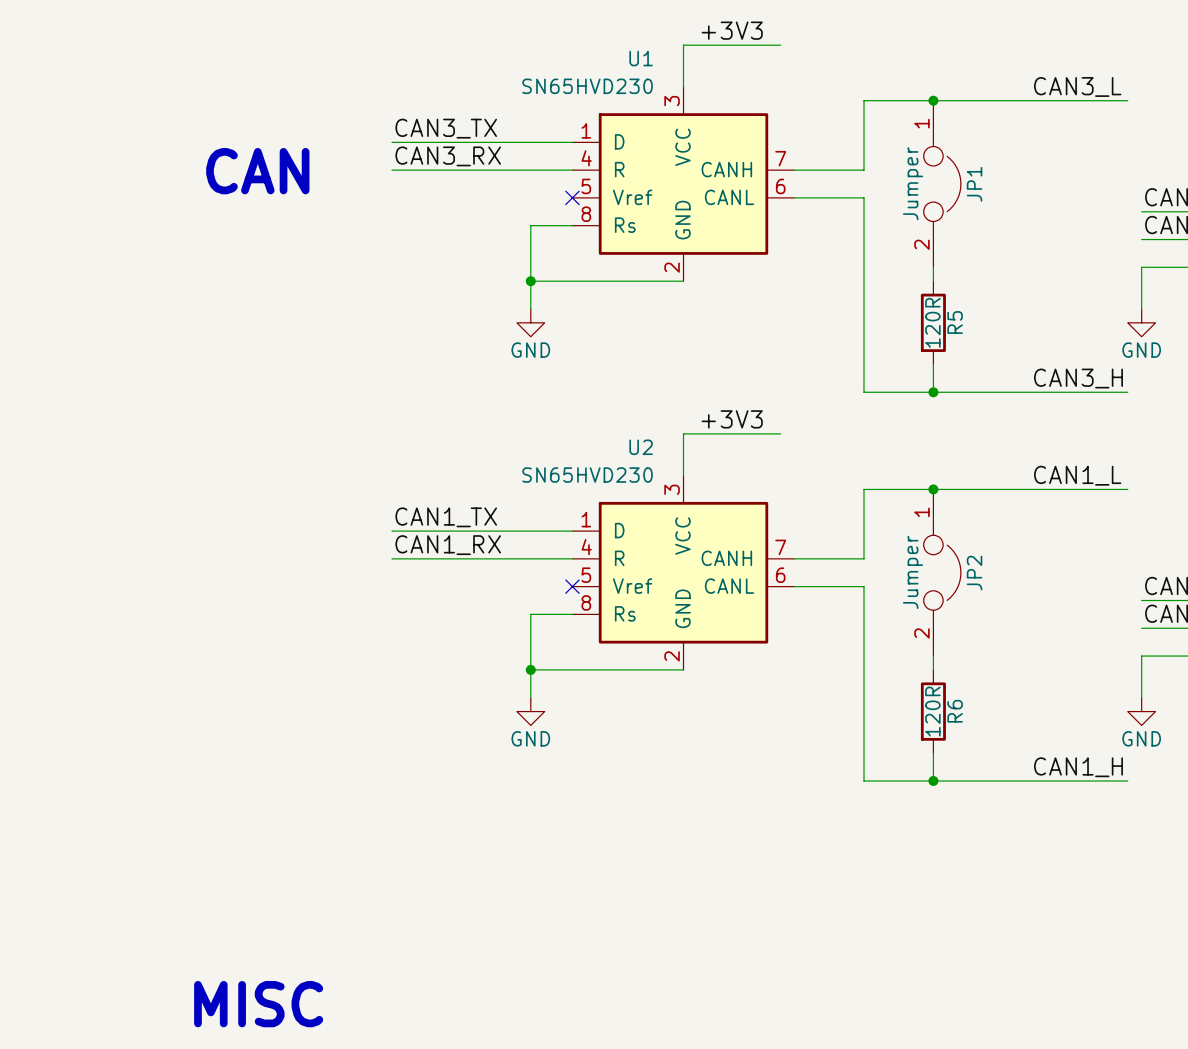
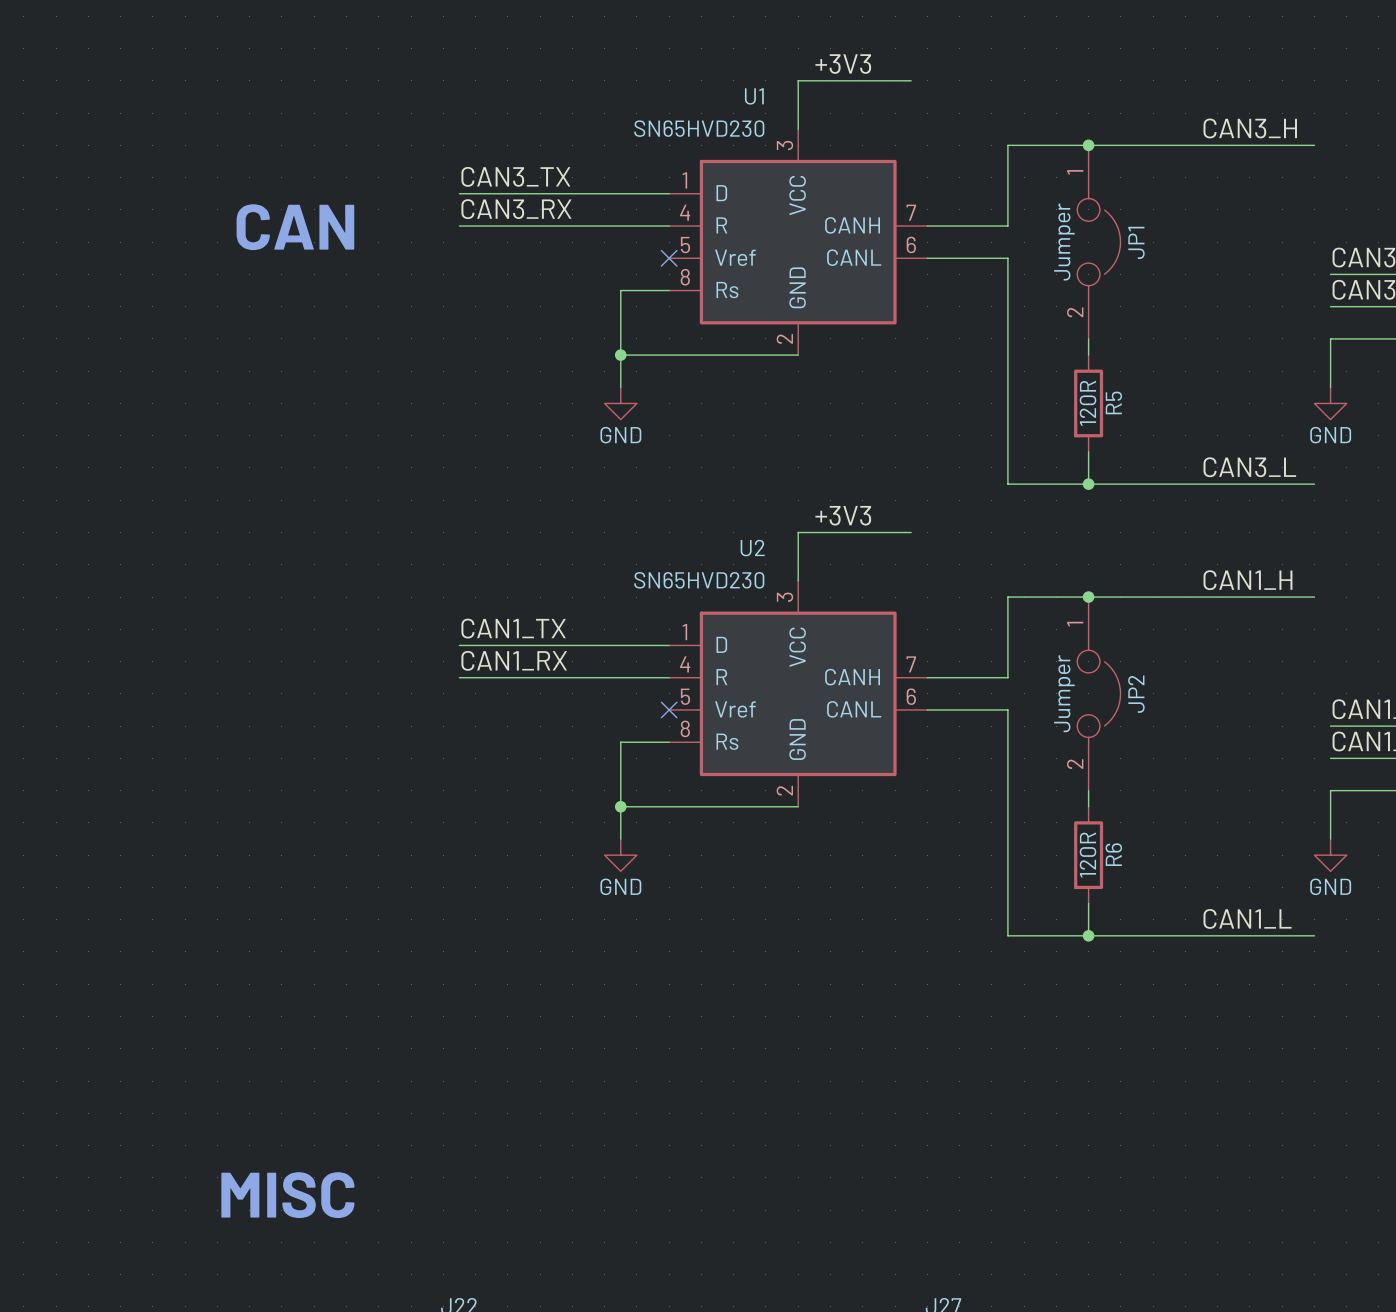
label: CAN3_L (1077, 86) -> CAN3_H (1250, 128)
label: CAN3_H (1078, 378) -> CAN3_L (1249, 467)
label: CAN1_L (1077, 475) -> CAN1_H (1247, 580)
label: CAN1_H (1078, 767) -> CAN1_L (1247, 918)

